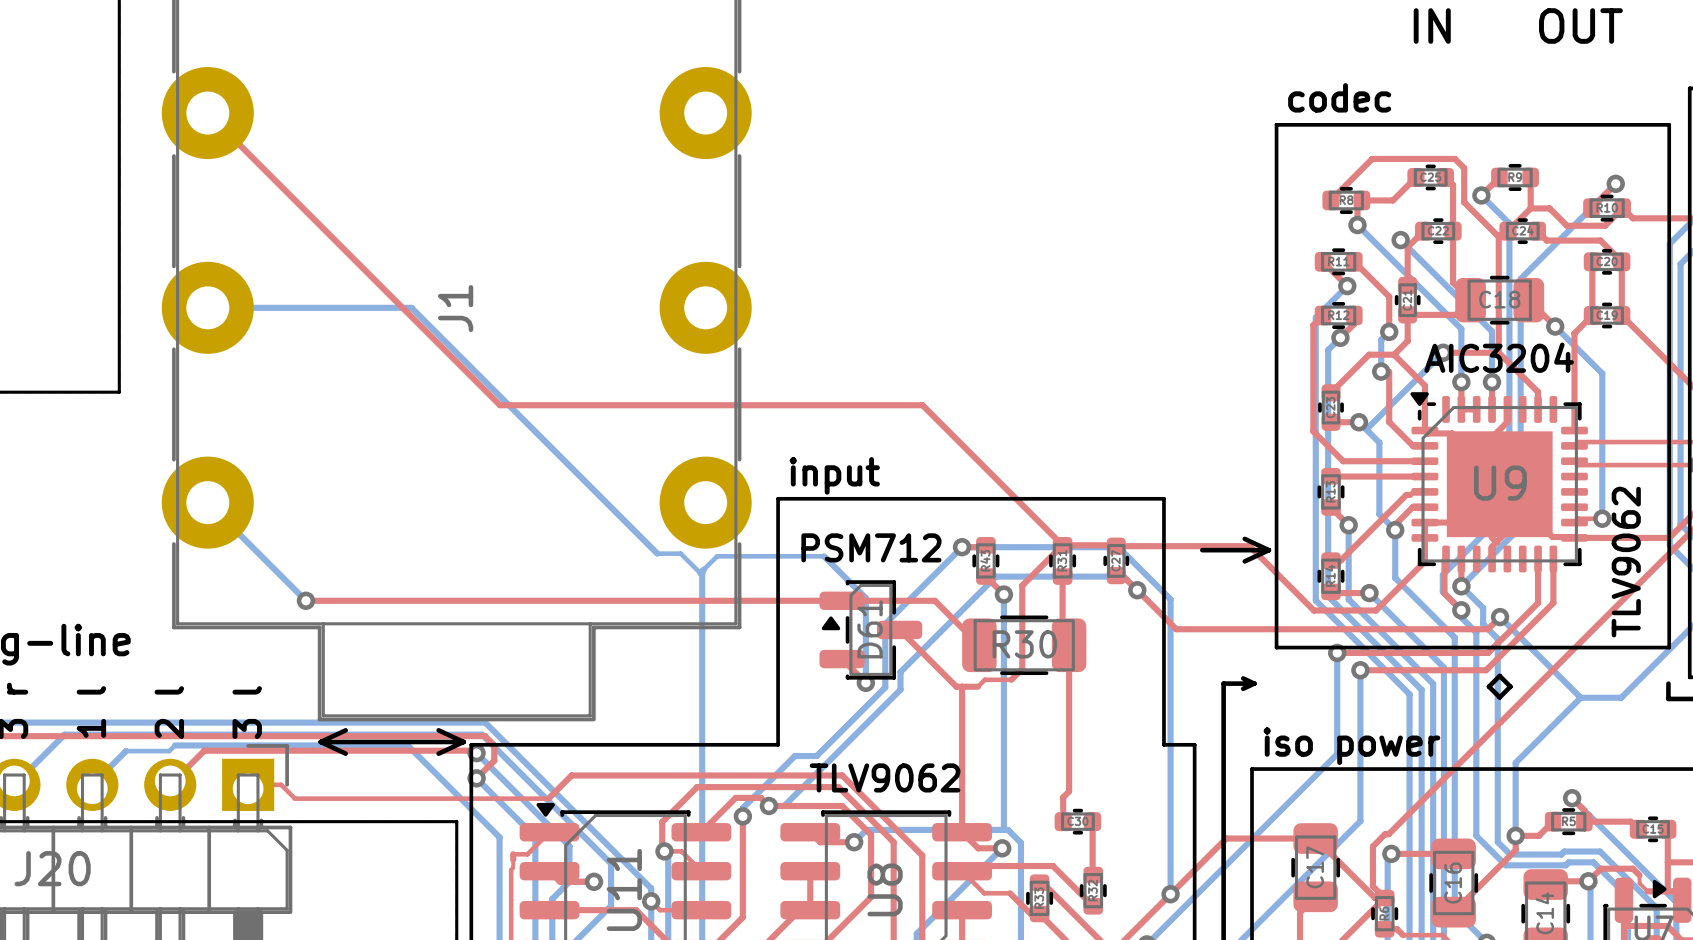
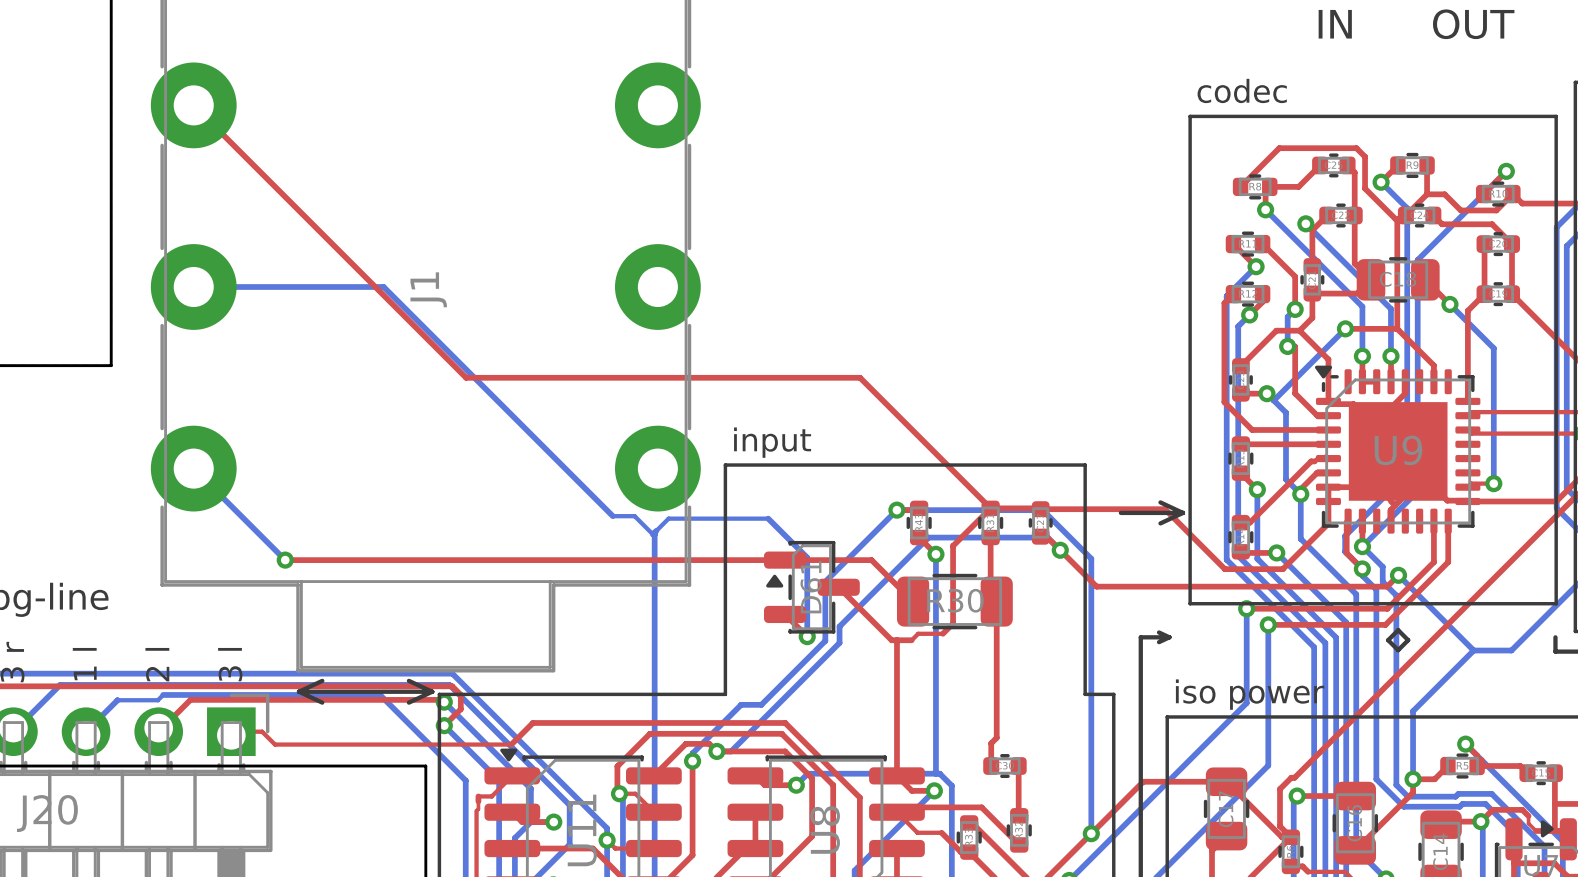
text: AIC3204 (1499, 357) -> none
text: PSM712 (871, 547) -> none
text: TLV9062 (1626, 562) -> none
text: TLV9062 (885, 777) -> none

